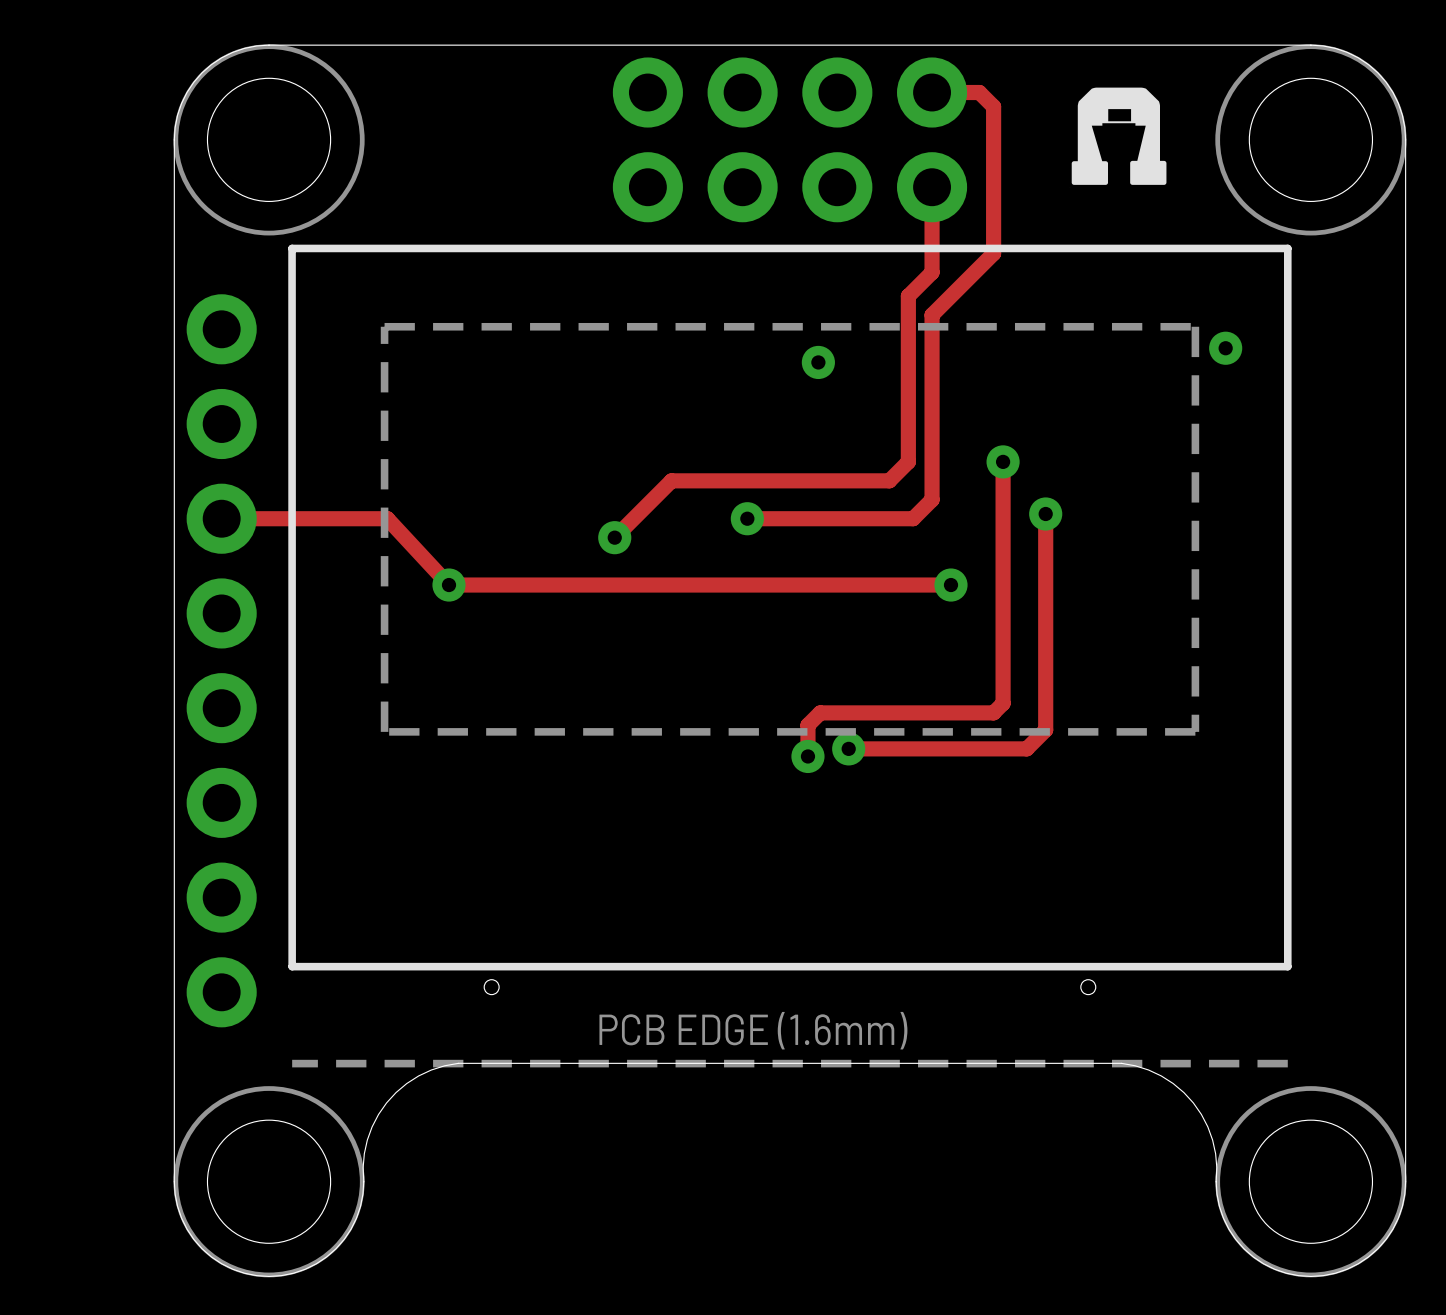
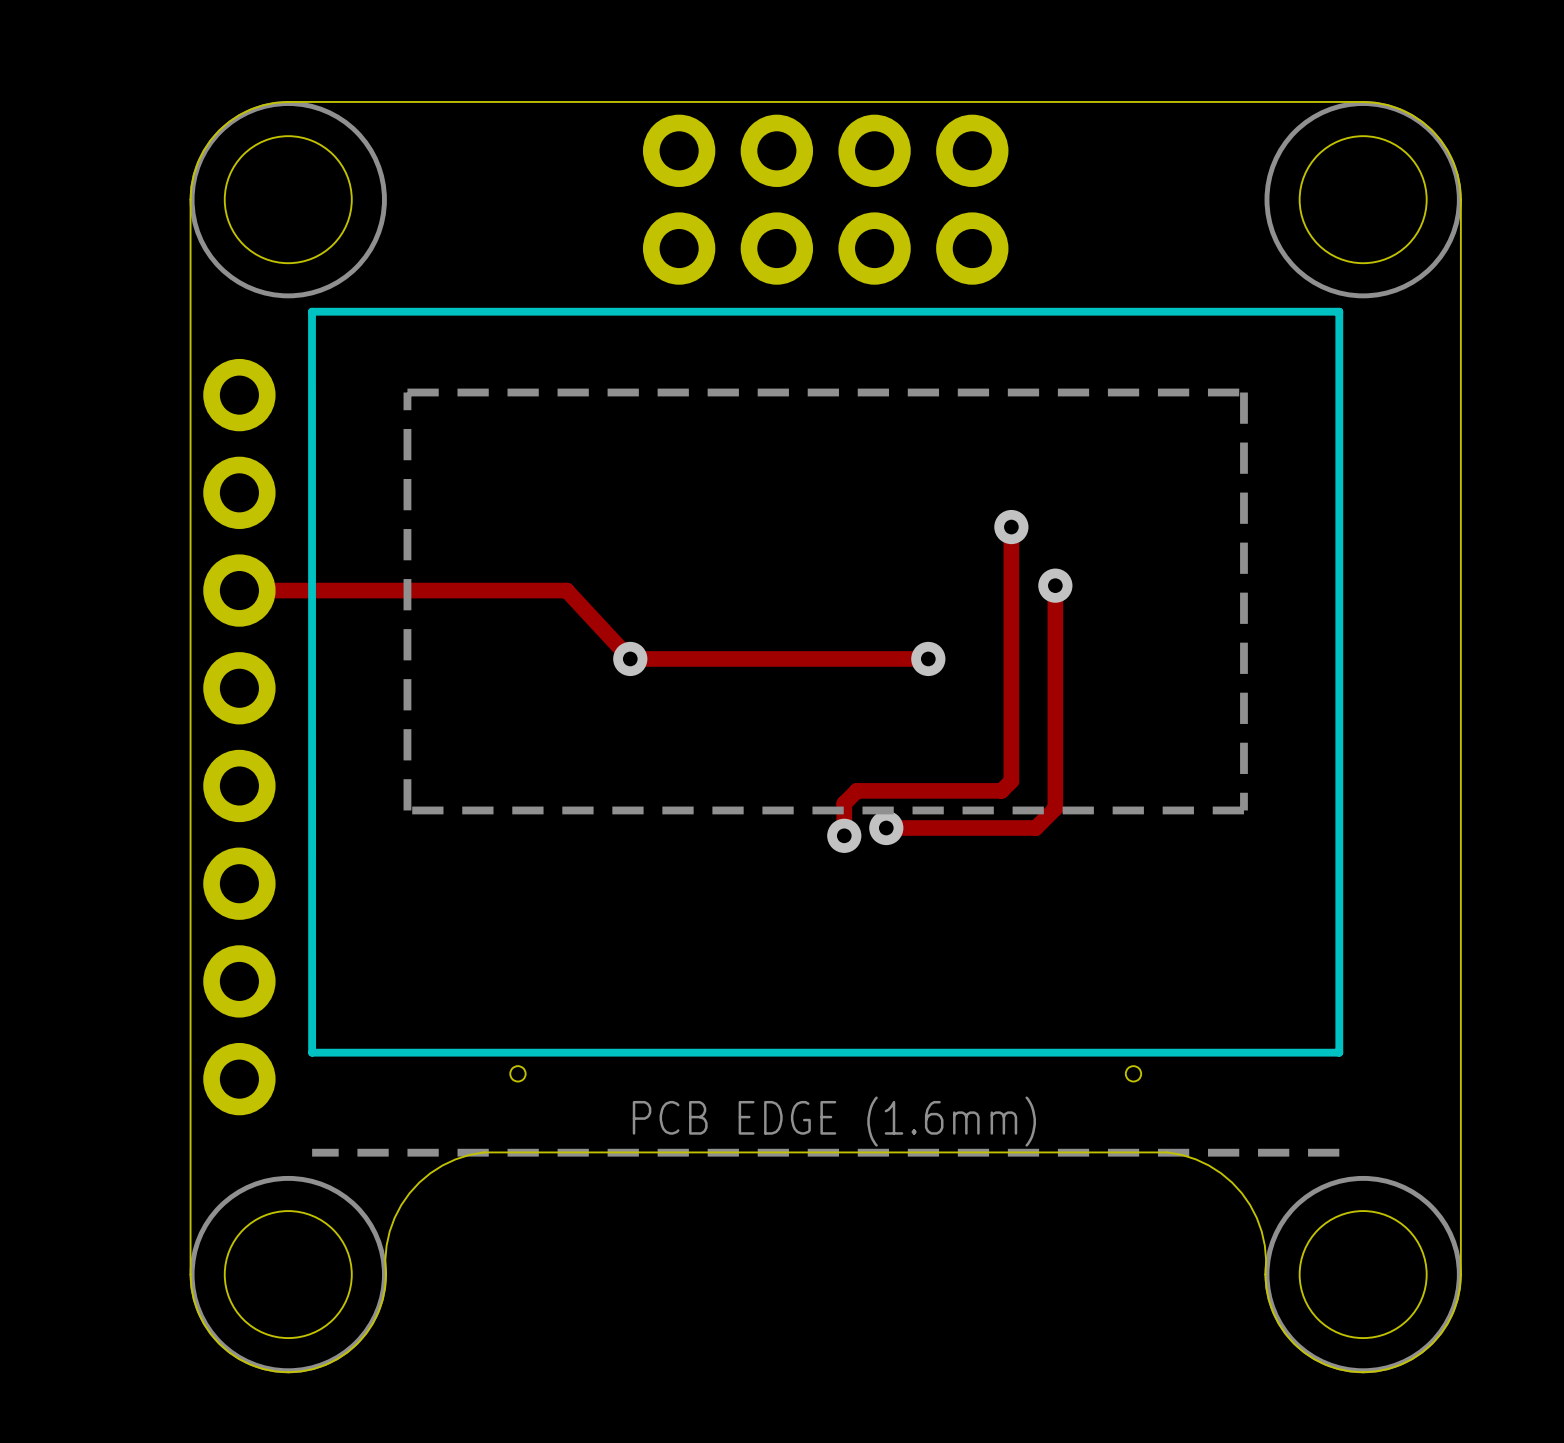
drawing: [1071, 87, 1167, 185] -> none
track: (932, 92) (979, 92) (993, 106) (993, 253) (932, 315) (932, 499) (913, 518) (747, 518) -> none
track: (932, 187) (932, 272) (908, 296) (908, 461) (889, 480) (671, 480) (614, 537) -> none
via: (1225, 348) -> none
via: (818, 362) -> none
track: (1003, 461) (1003, 703) (993, 712) (960, 712) -> (1011, 527) (1011, 781) (1001, 790)
via position: (1003, 461) -> (1011, 527)
track: (1045, 513) (1045, 729) (1026, 748) (993, 748) -> (1055, 585) (1055, 808) (1035, 828)
via position: (1045, 513) -> (1055, 585)
track: (387, 518) (449, 585) (600, 585) -> (410, 590) (566, 590) (630, 658)
via: (747, 518) -> none
via position: (614, 537) -> (630, 658)
via: (449, 585) -> none
track: (889, 585) (950, 585) -> none
via: none -> (928, 658)
via: (950, 585) -> none

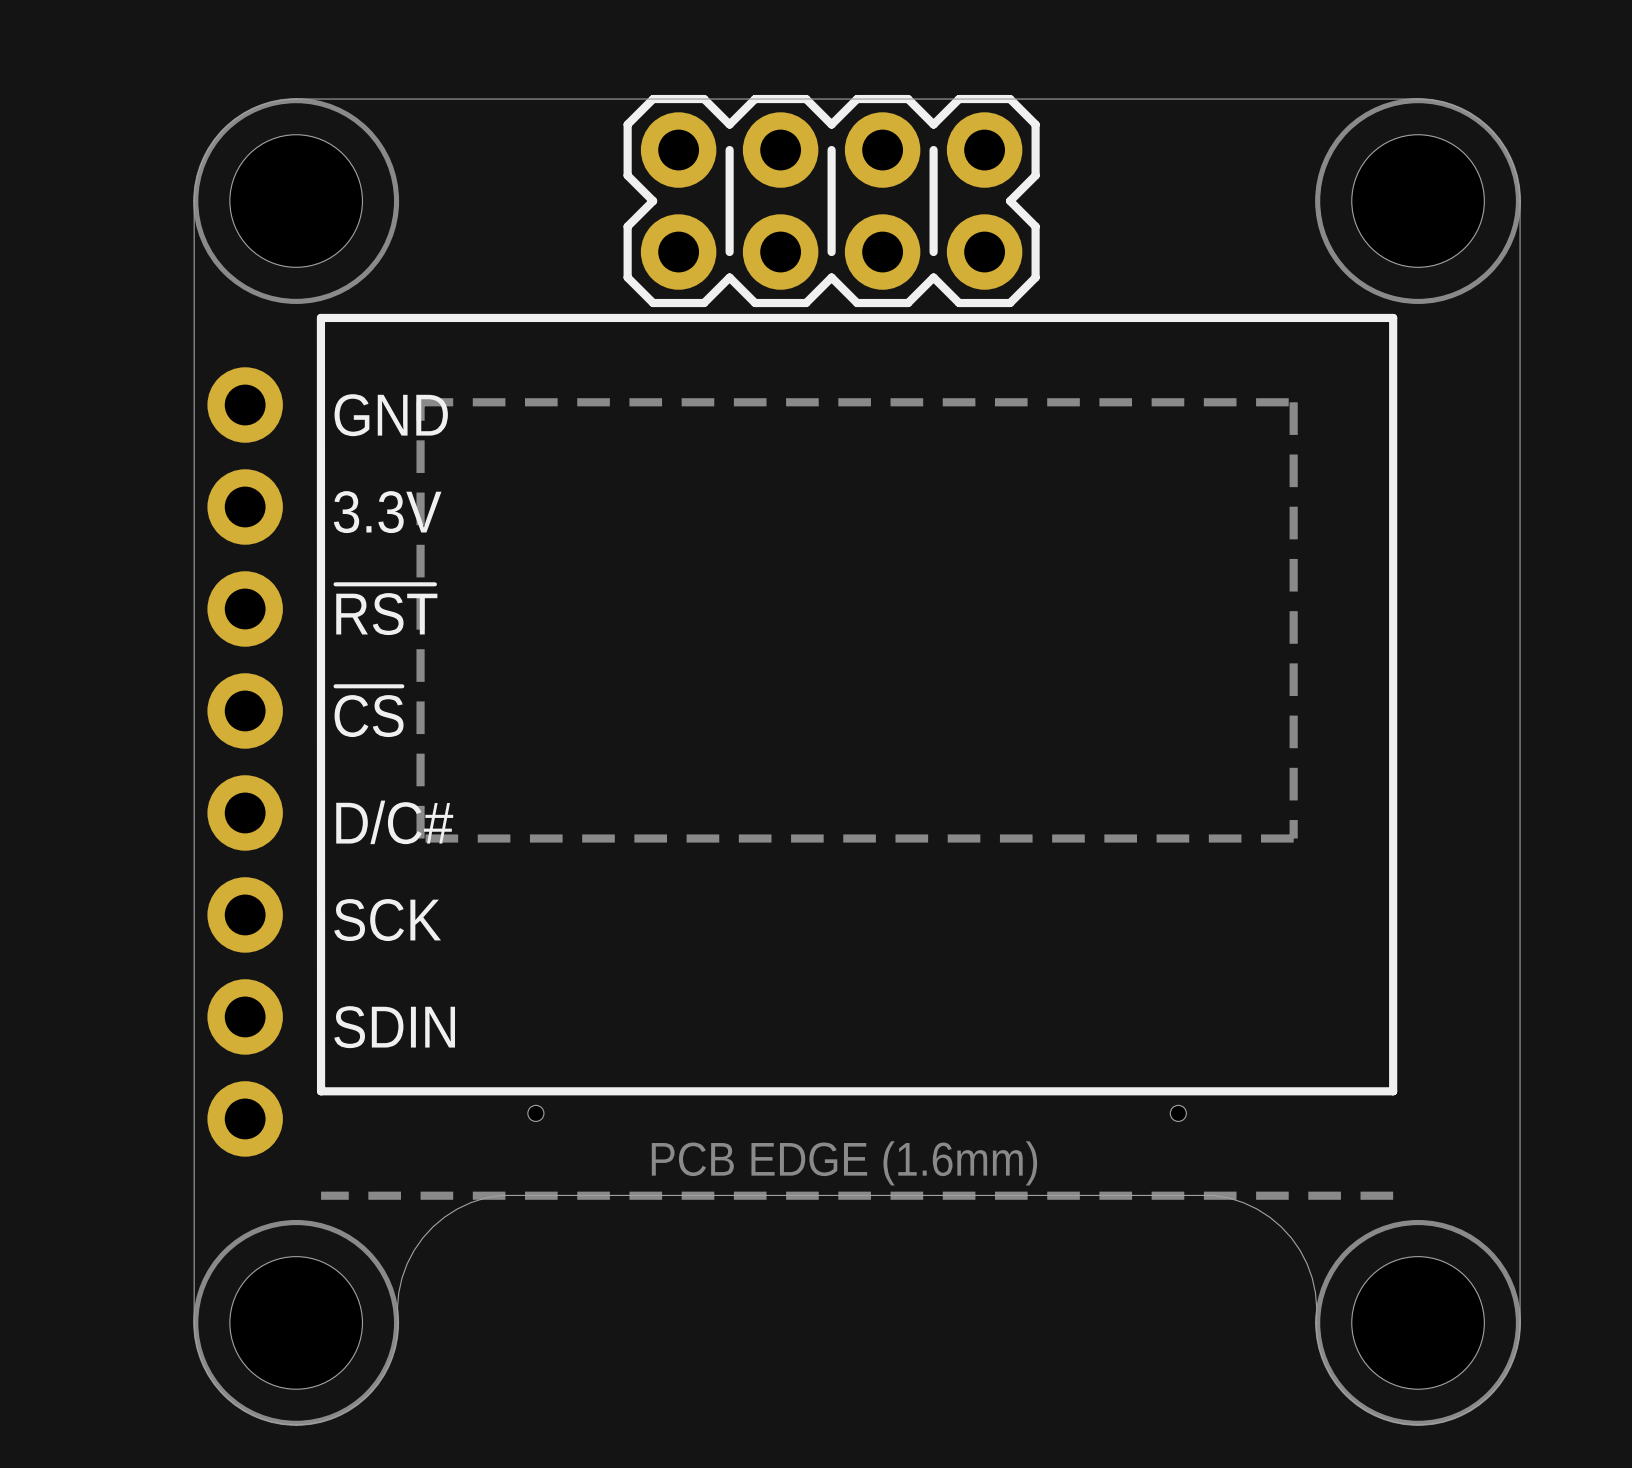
part side: bottom (825, 199) -> top (831, 201)
text: none -> GND (391, 415)
text: none -> 3.3V (387, 512)
track: (1011, 527) (1011, 781) (1001, 790) (856, 790) (844, 803) (844, 835) -> none
via: (1011, 527) -> none
track: (1055, 585) (1055, 808) (1035, 828) (886, 828) -> none
via: (1055, 585) -> none
track: (239, 590) (566, 590) (630, 658) (928, 658) -> none
text: none -> ~{RST} (386, 609)
via: (630, 658) -> none
via: (928, 658) -> none
text: none -> ~{CS} (369, 711)
text: none -> D/C# (394, 822)
via: (886, 828) -> none
via: (844, 835) -> none
text: none -> SCK (387, 920)
text: none -> SDIN (394, 1027)

